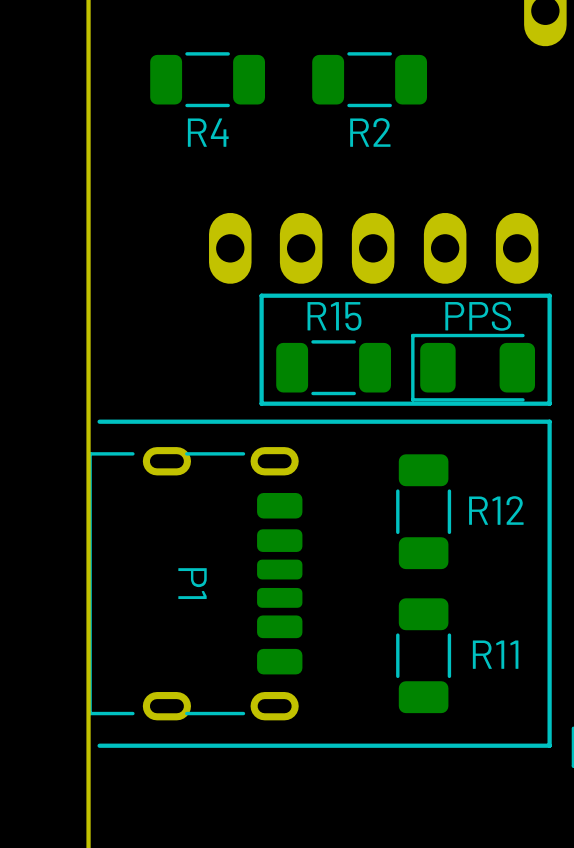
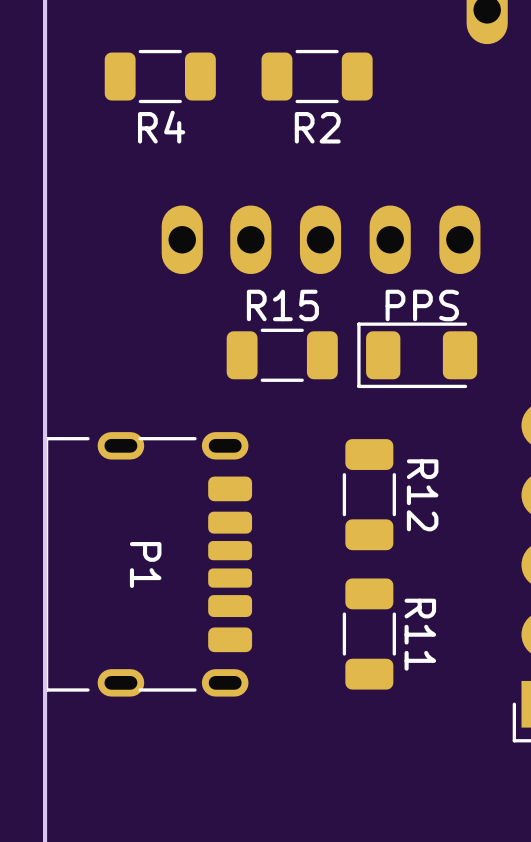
line: (549, 295) (549, 403) (261, 403) (261, 295) (549, 295) -> none
line: (99, 421) (549, 421) (549, 745) (99, 745) -> none
R12 name rotation: 0° (496, 510) -> 90° clockwise (422, 495)
R11 name rotation: 0° (495, 654) -> 90° clockwise (420, 634)

